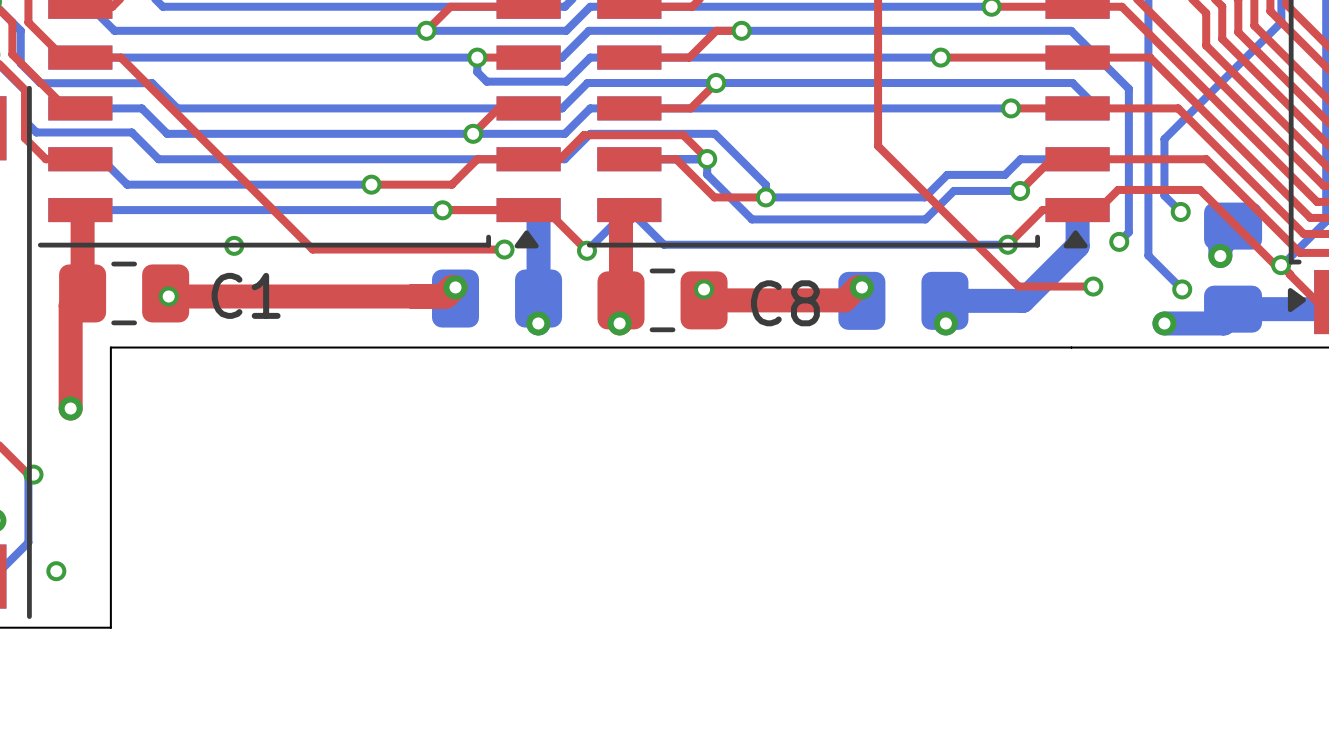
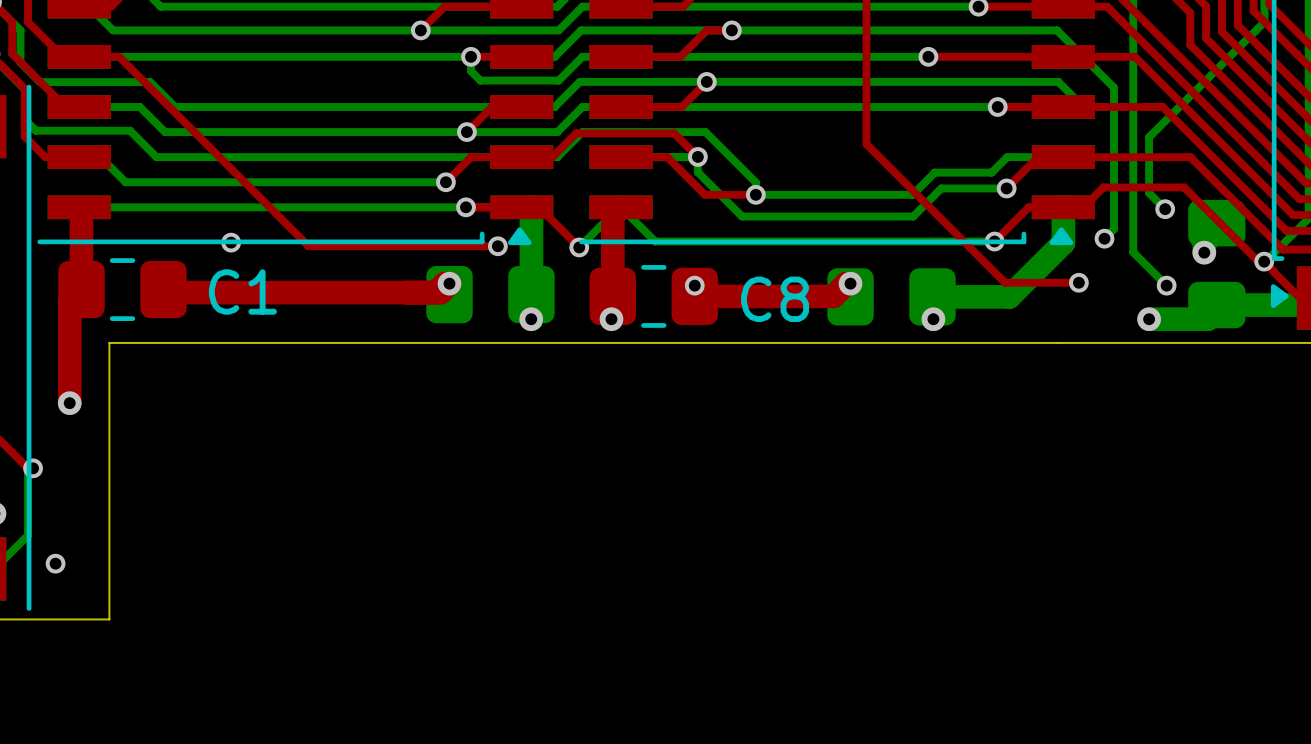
top track: (371, 184) (451, 184) -> none
bottom track: none -> (366, 182) (445, 182)
via: (371, 184) -> none
via: none -> (445, 182)
top track: (442, 210) (472, 210) -> none
bottom track: none -> (436, 207) (466, 207)
via: (442, 210) -> none
via: none -> (466, 207)
via: (168, 296) -> none

